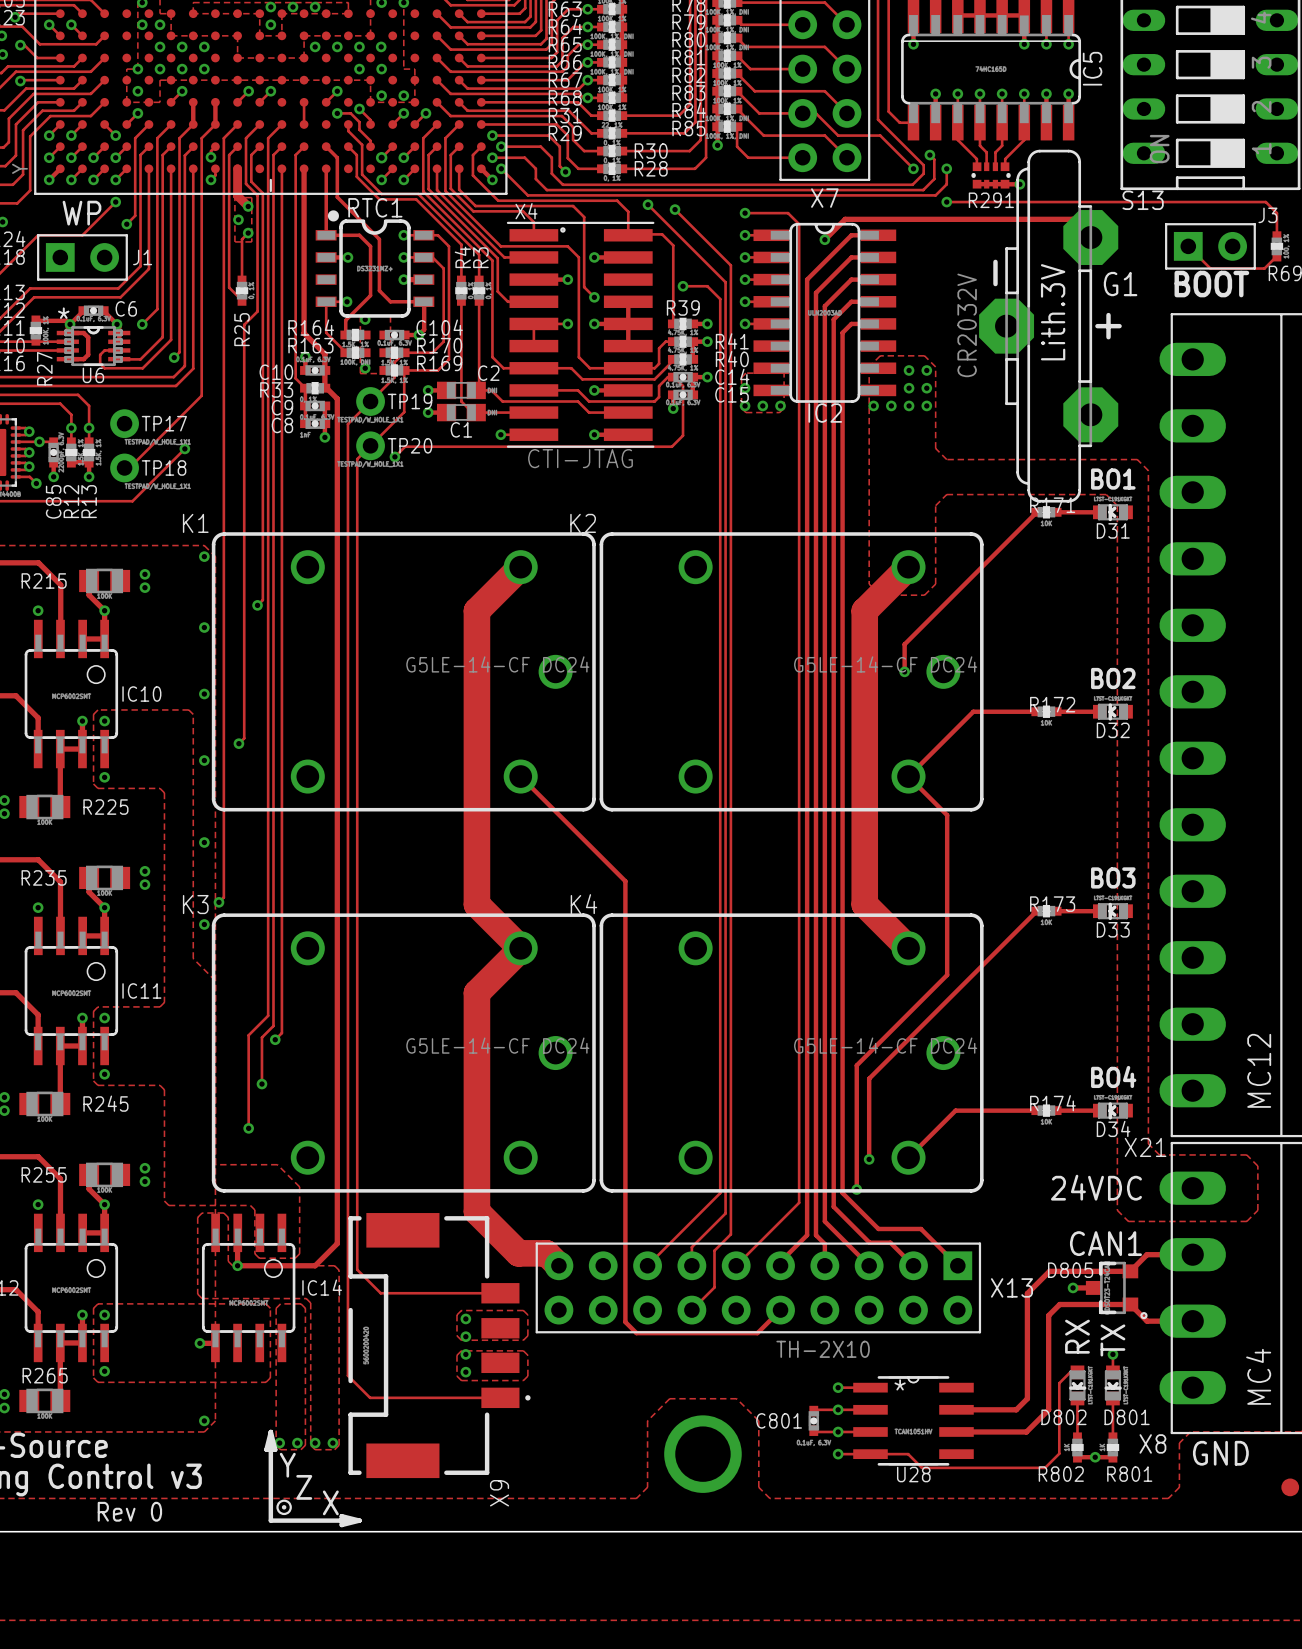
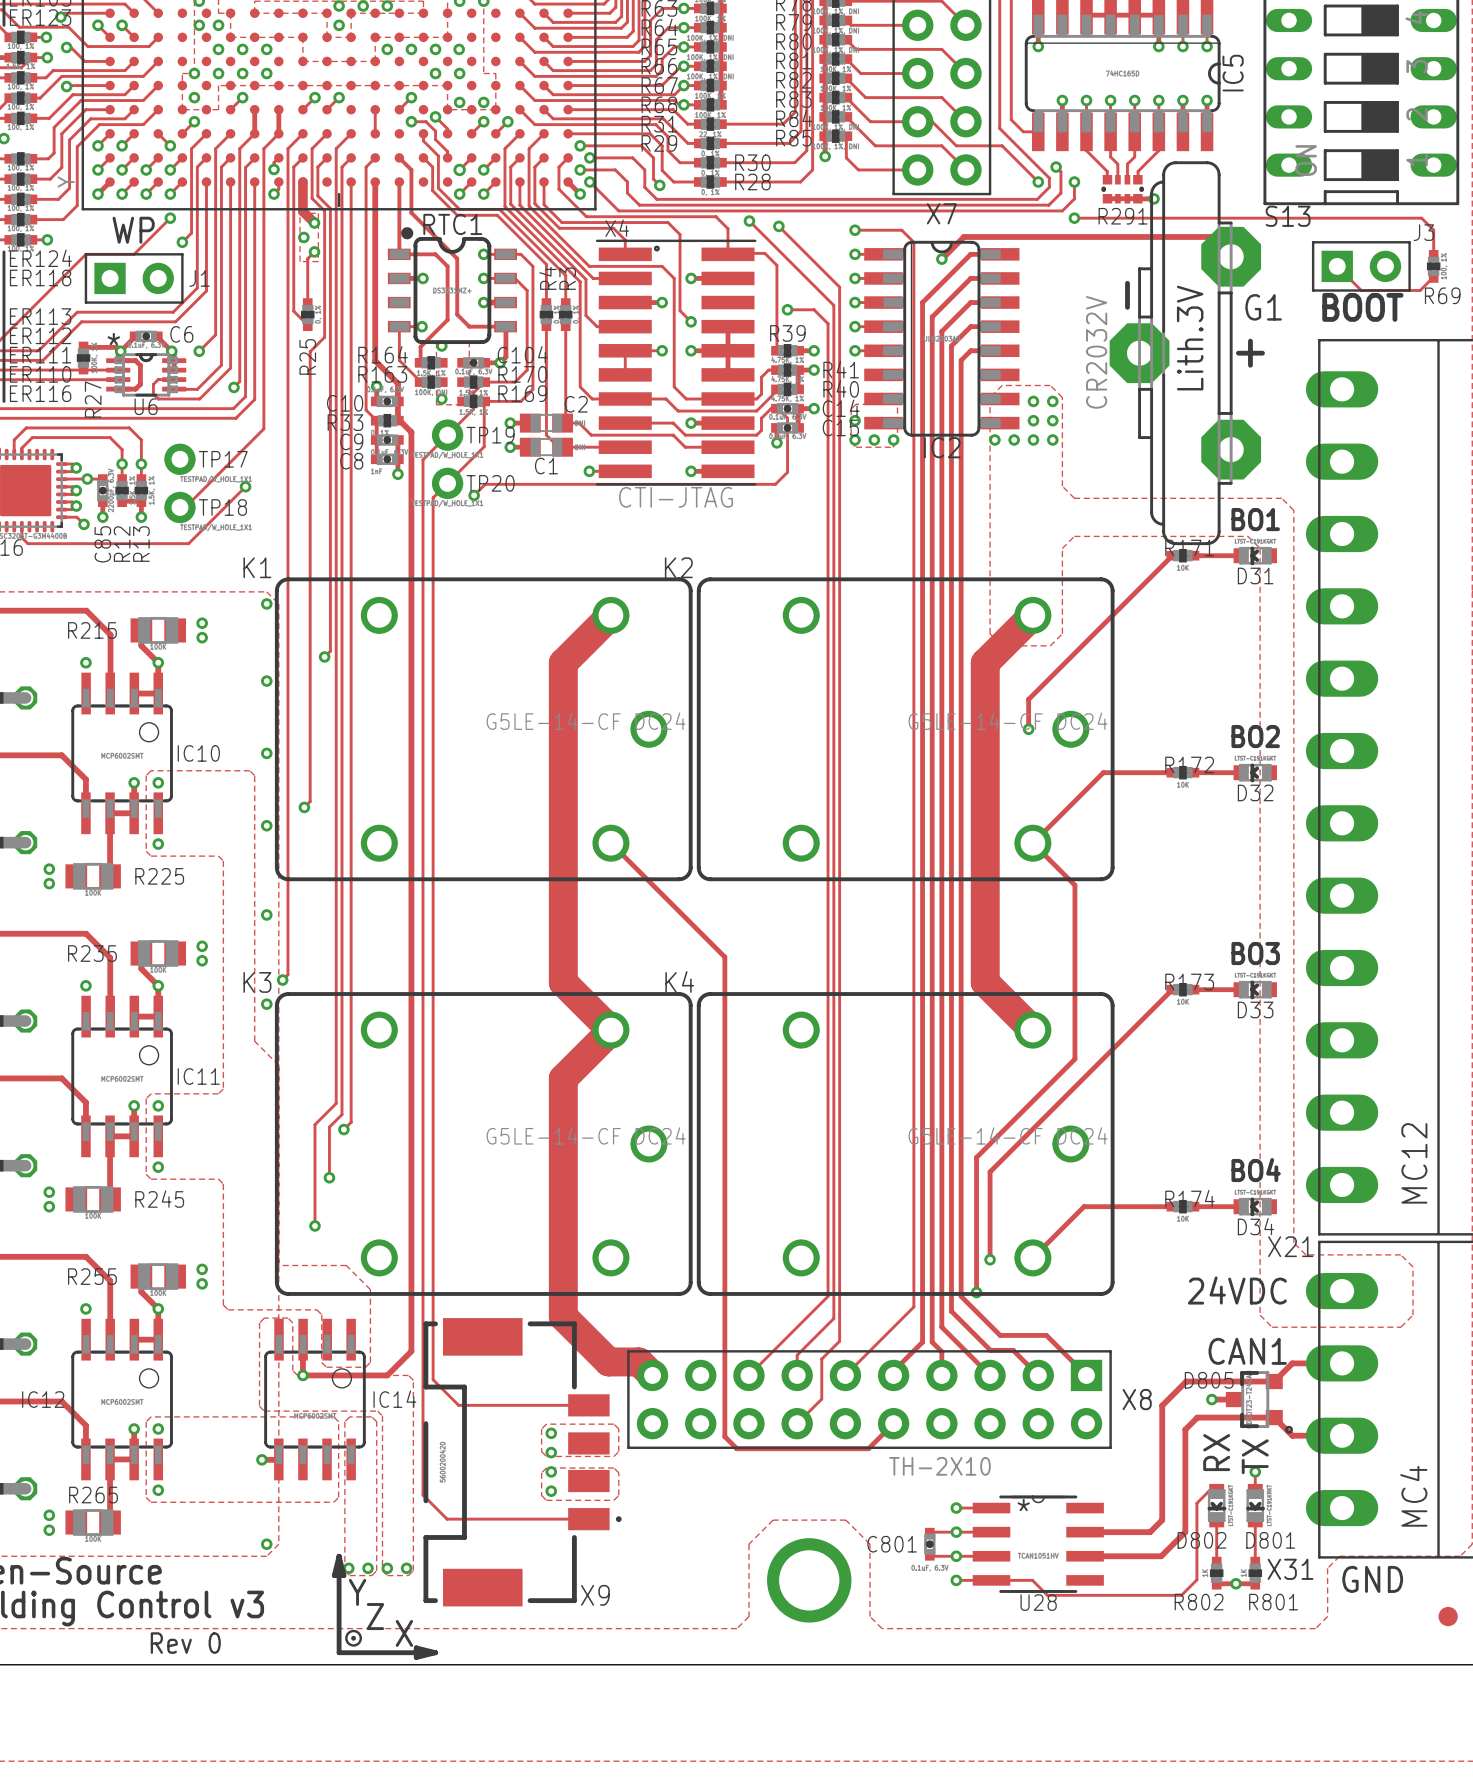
X13 name: X13 (1011, 1287) -> X8 (1137, 1399)
X8 name: X8 (1152, 1443) -> X31 (1290, 1569)
X9 name rotation: 0° (499, 1493) -> 90° clockwise (595, 1595)

